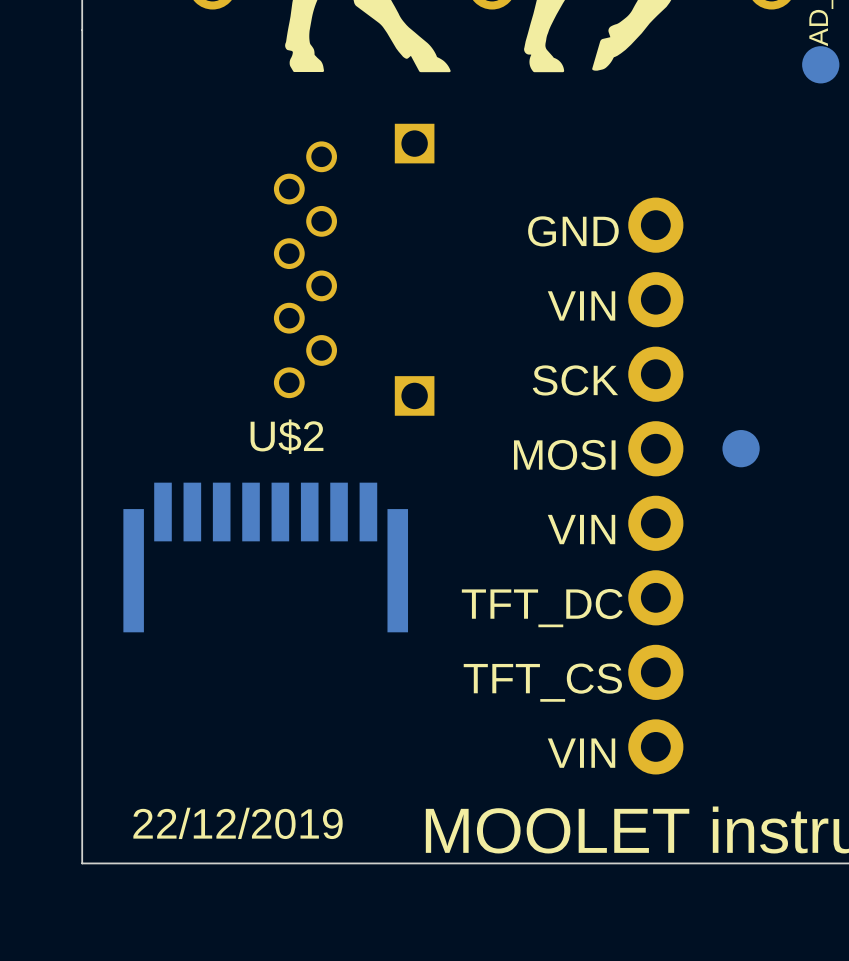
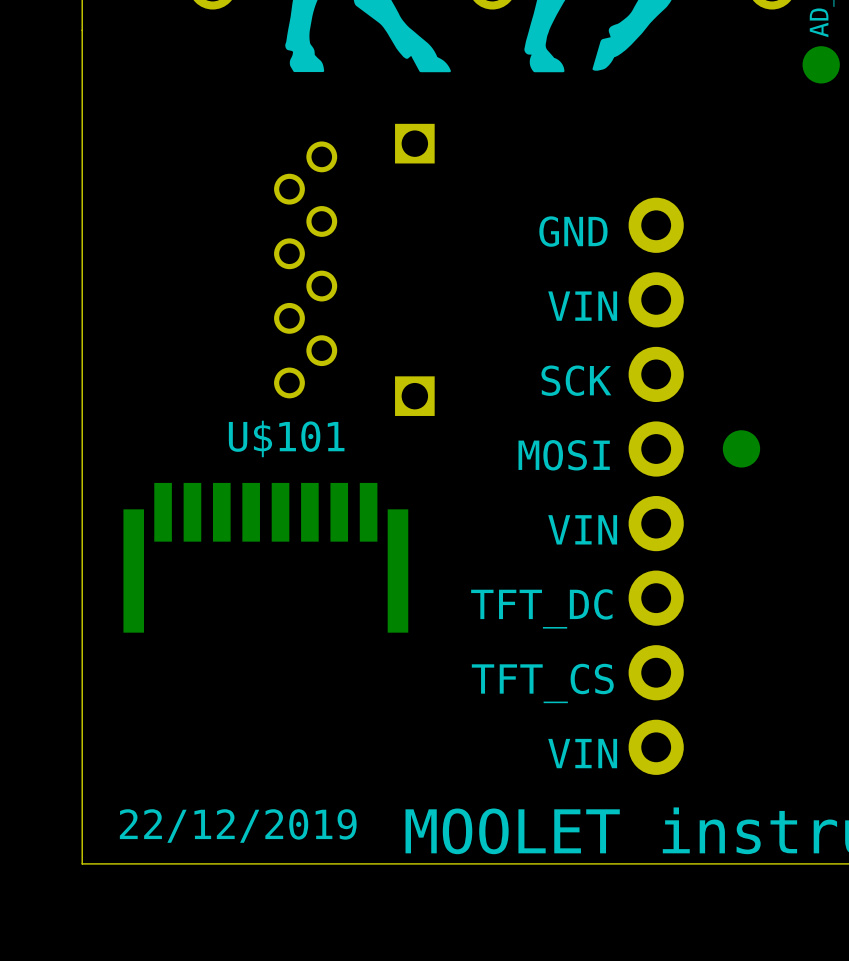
U$2 name: U$2 (286, 436) -> U$101 (286, 438)

